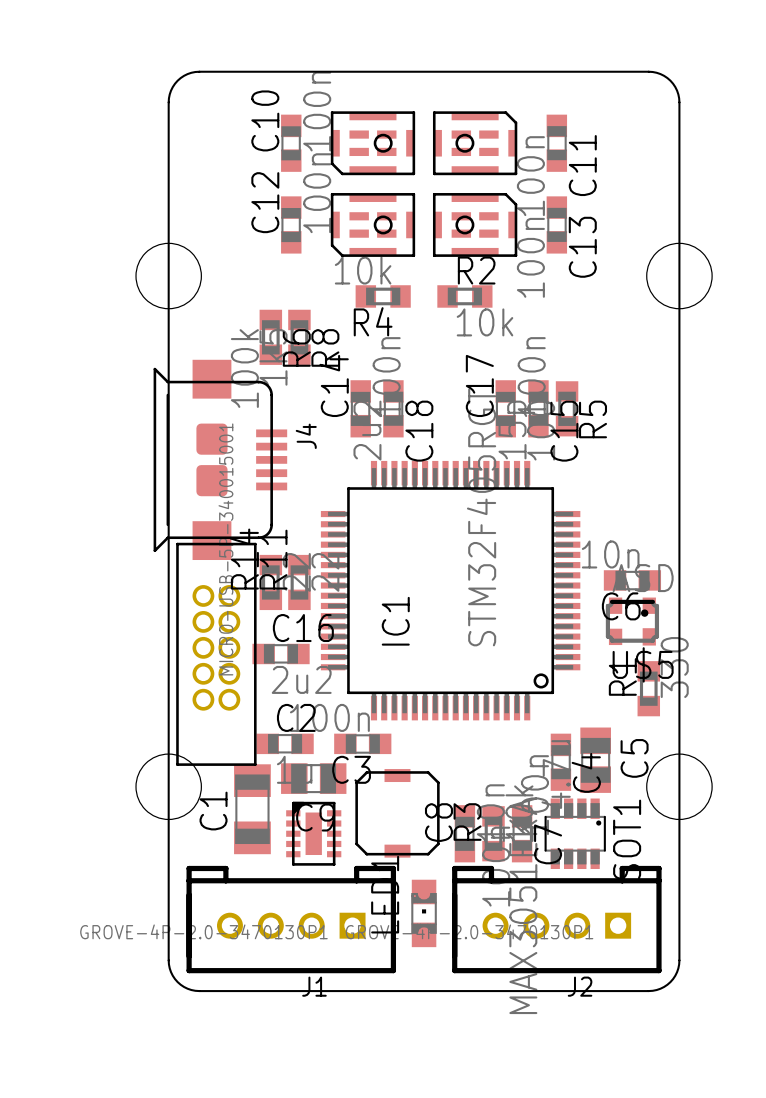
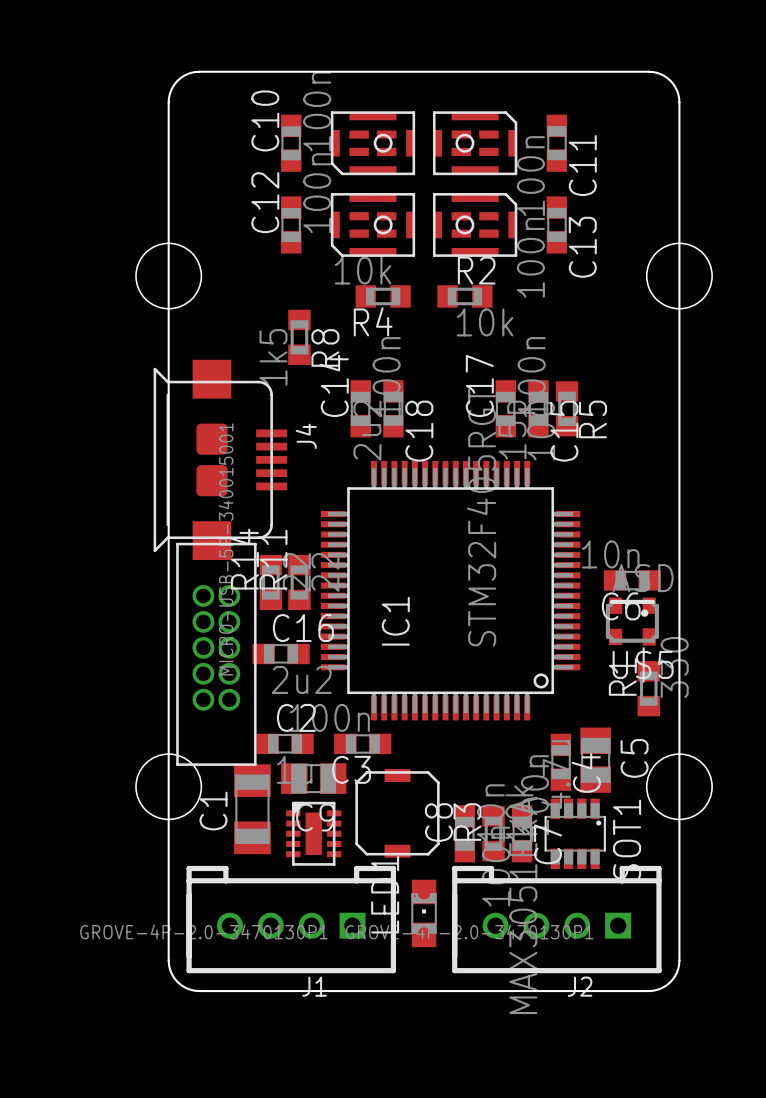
R6: 100k (270, 337) -> none

